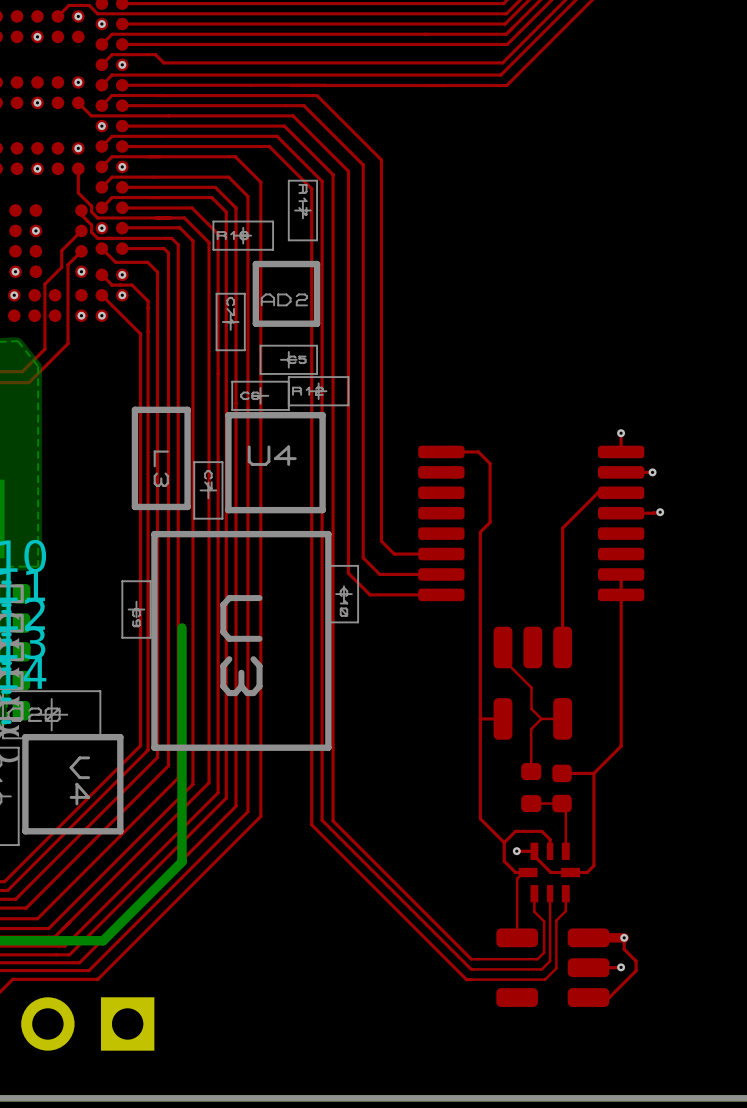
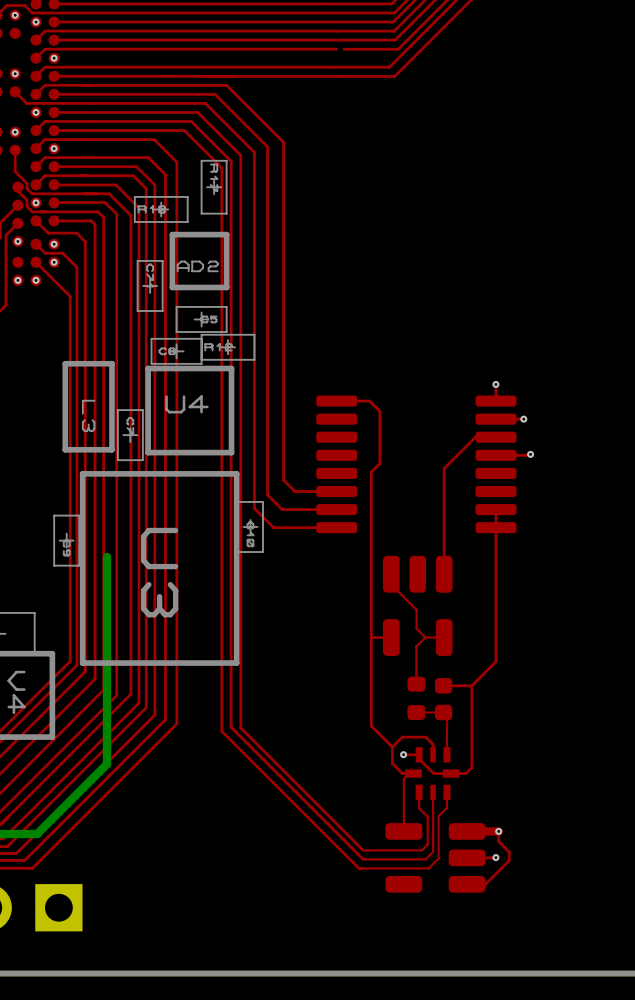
top track: (510, 54) (502, 62) (163, 62) (155, 54) -> (336, 49) (83, 49)
top track: none -> (398, 49) (344, 49)

